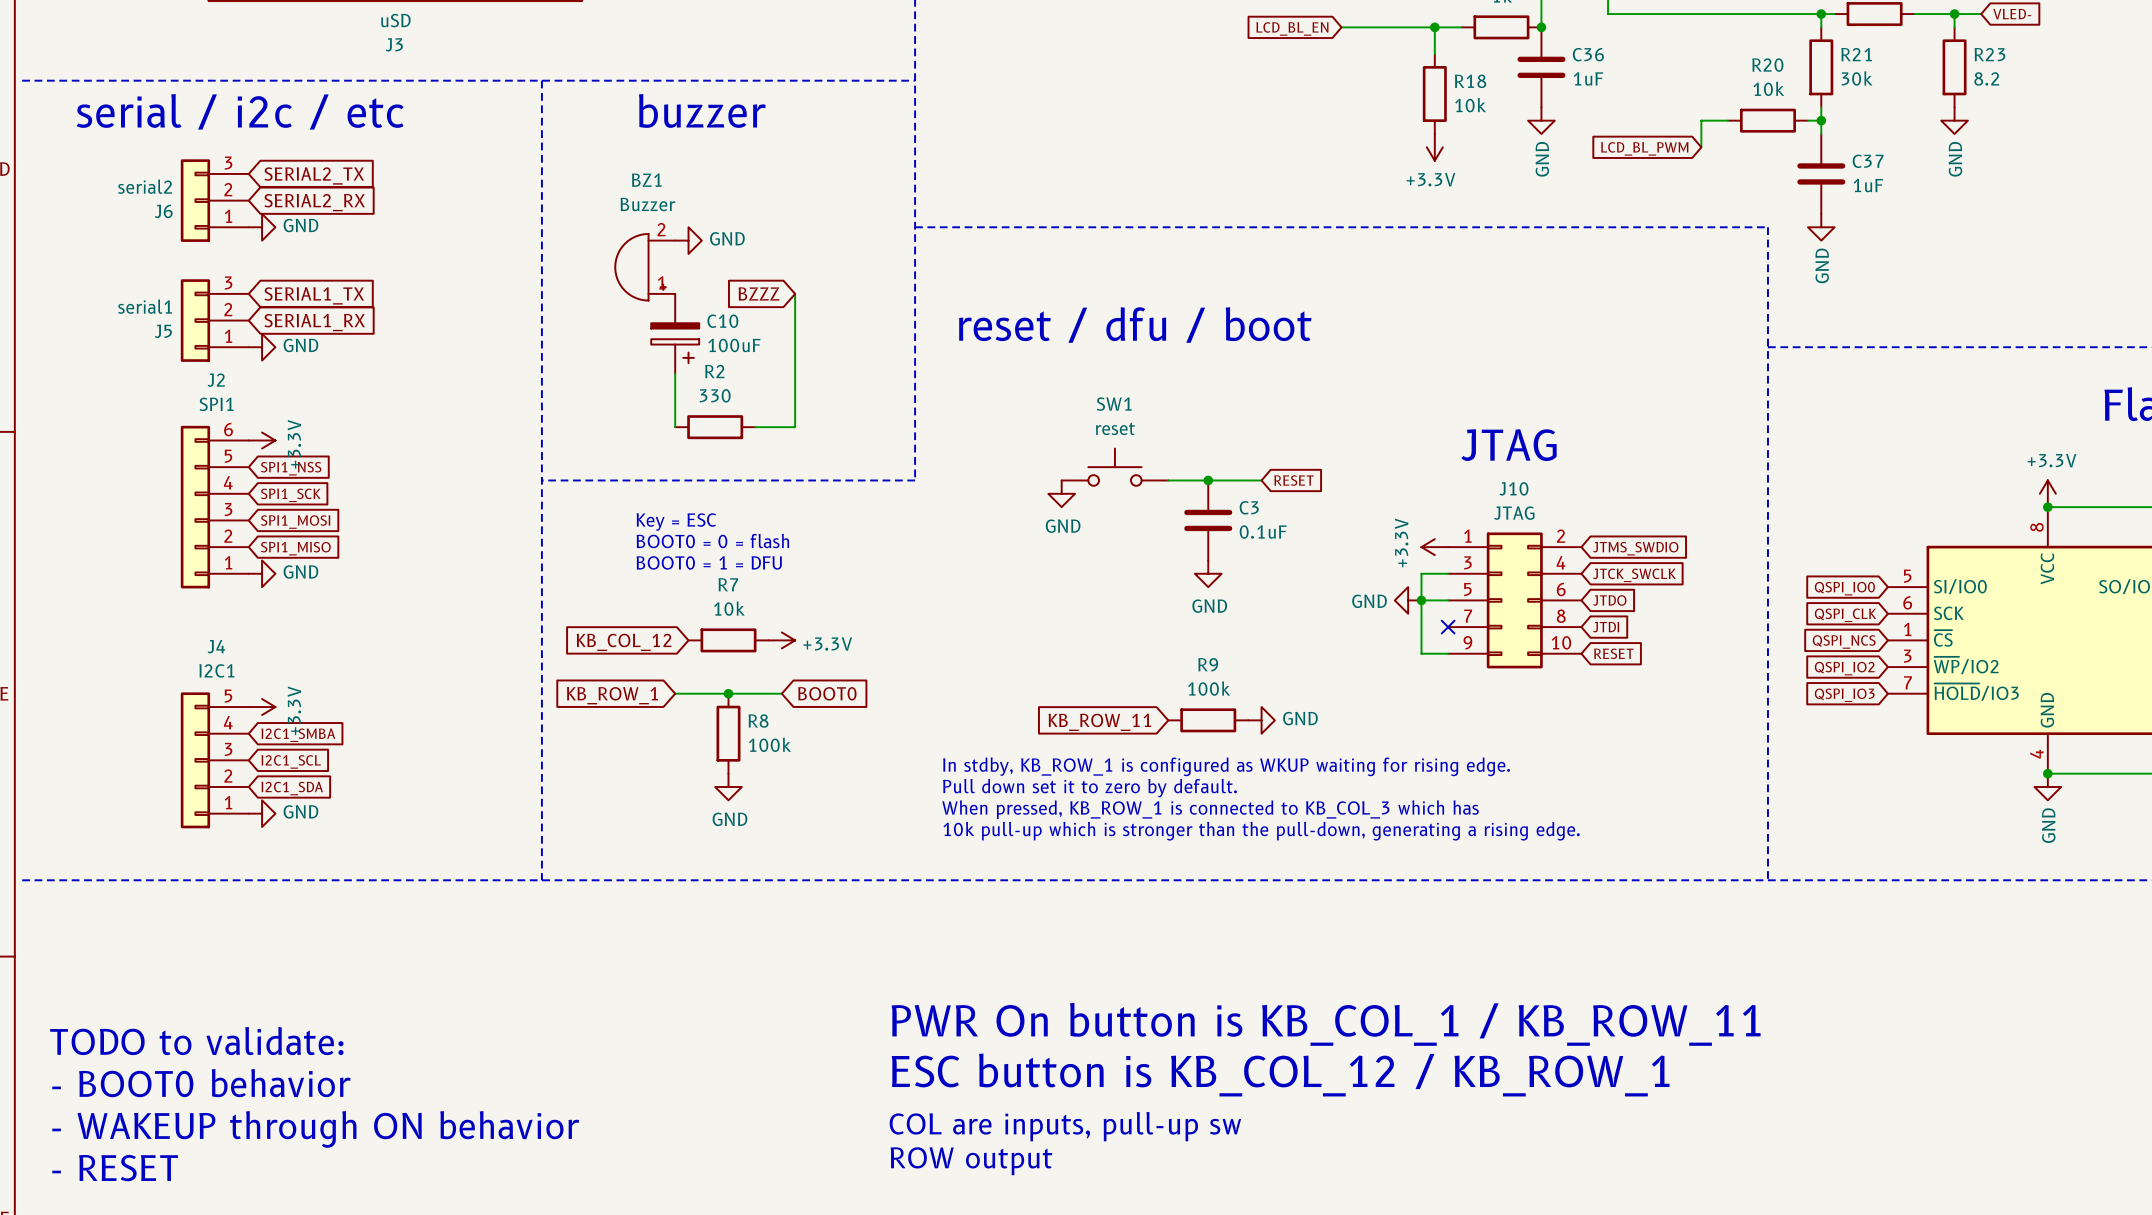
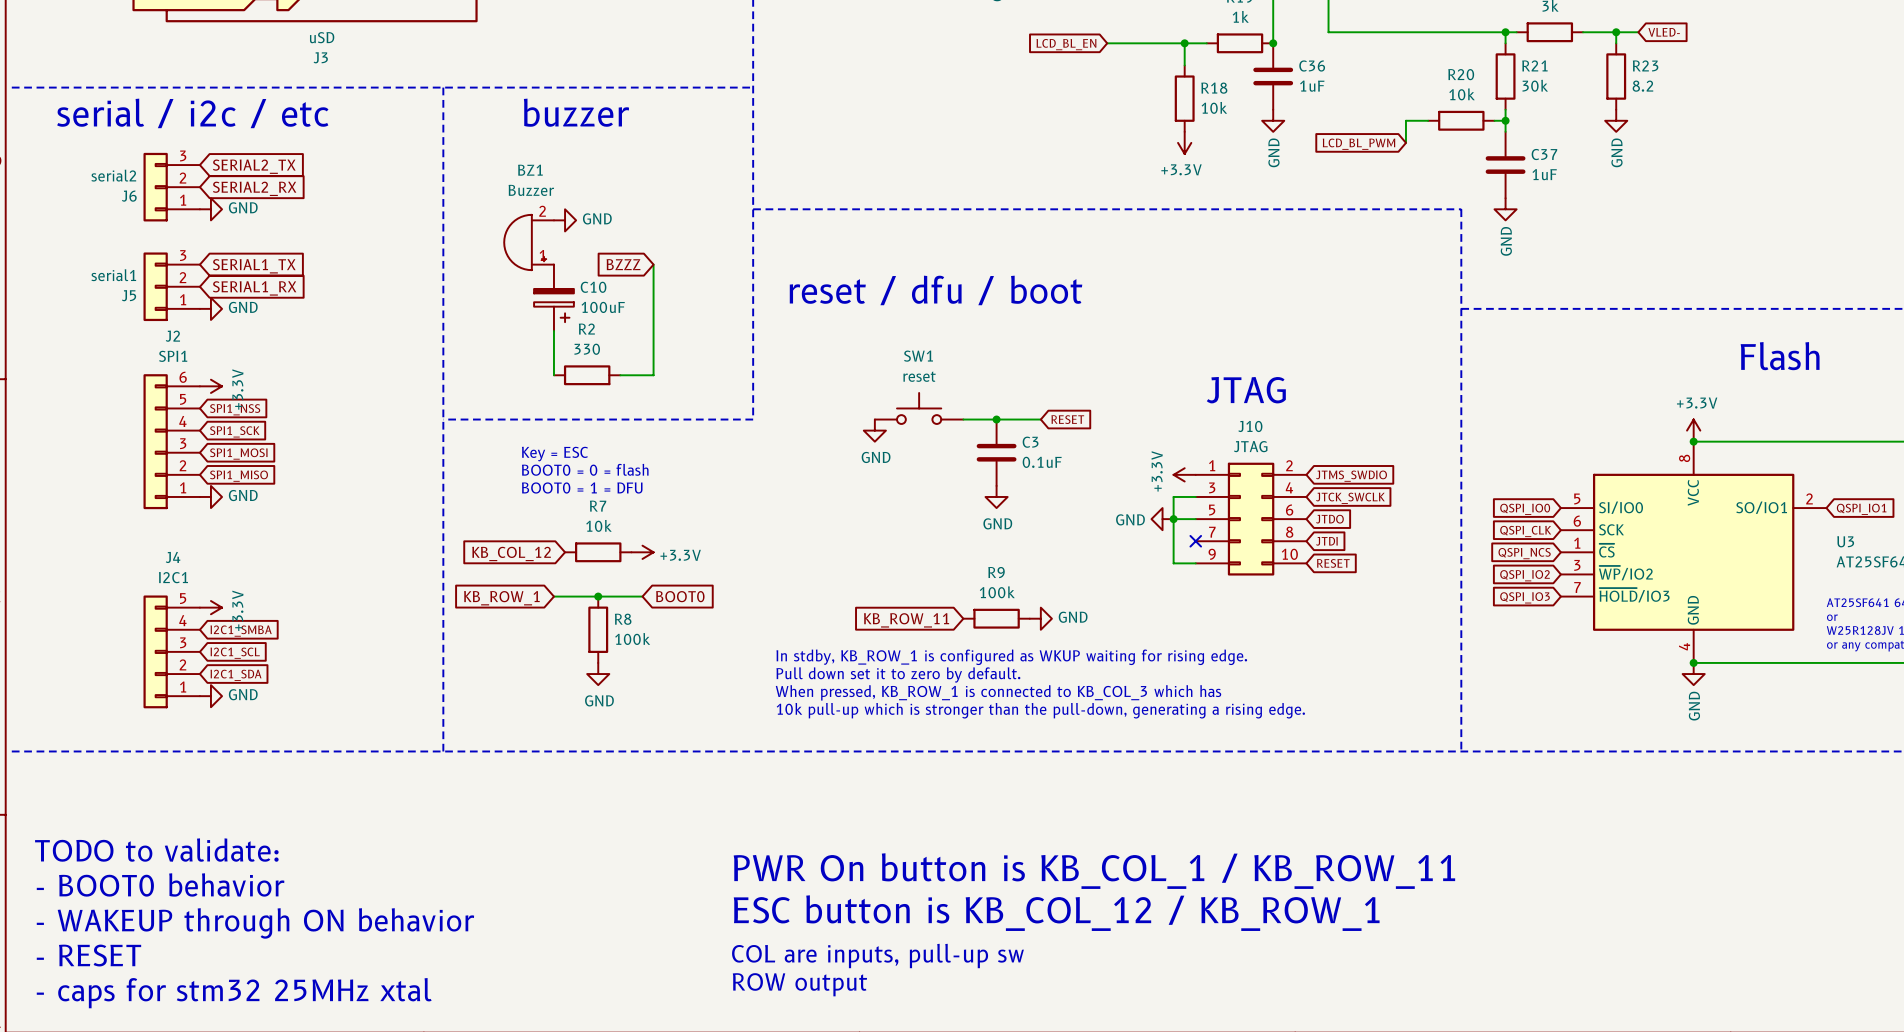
text: none -> TODO to validate: (156, 850)
text: TODO to validate: (196, 1041) -> - BOOT0 behavior (160, 884)
text: - BOOT0 behavior (201, 1083) -> - WAKEUP through ON behavior (255, 923)
text: - WAKEUP through ON behavior (315, 1129) -> - RESET (88, 955)
text: - RESET (115, 1168) -> - caps for stm32 25MHz xtal (234, 993)

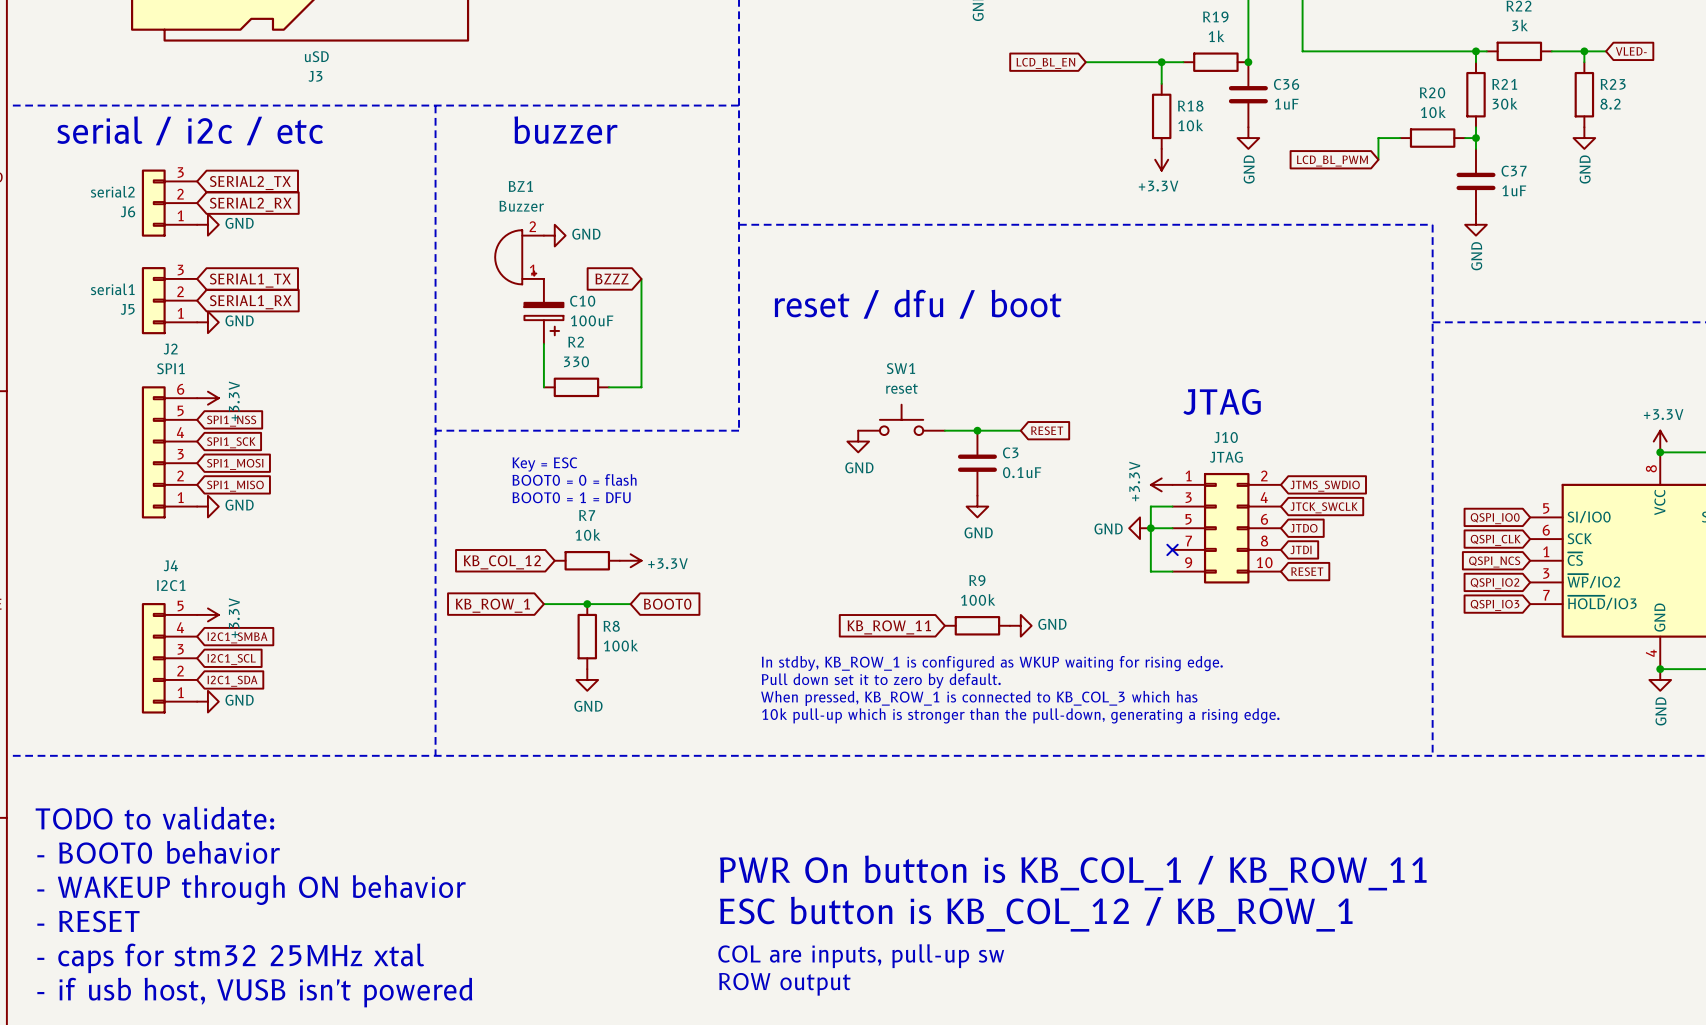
text: none -> TODO to validate: (154, 818)
text: TODO to validate: (156, 850) -> - BOOT0 behavior (158, 852)
text: - BOOT0 behavior (160, 884) -> - WAKEUP through ON behavior (251, 890)
text: - WAKEUP through ON behavior (255, 923) -> - RESET (88, 921)
text: - RESET (88, 955) -> - caps for stm32 25MHz xtal (230, 958)
text: - caps for stm32 25MHz xtal (234, 993) -> - if usb host, VUSB isn't powered (254, 992)

